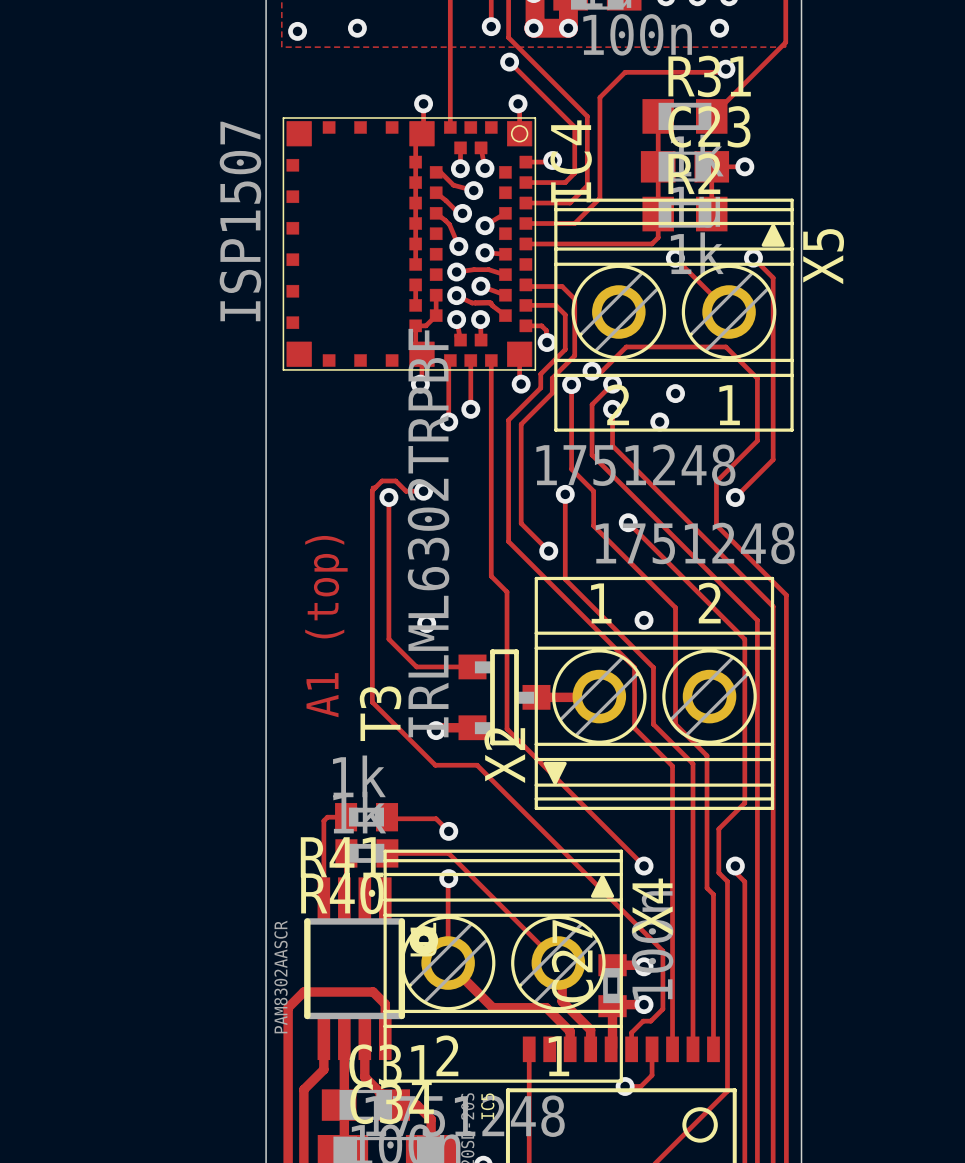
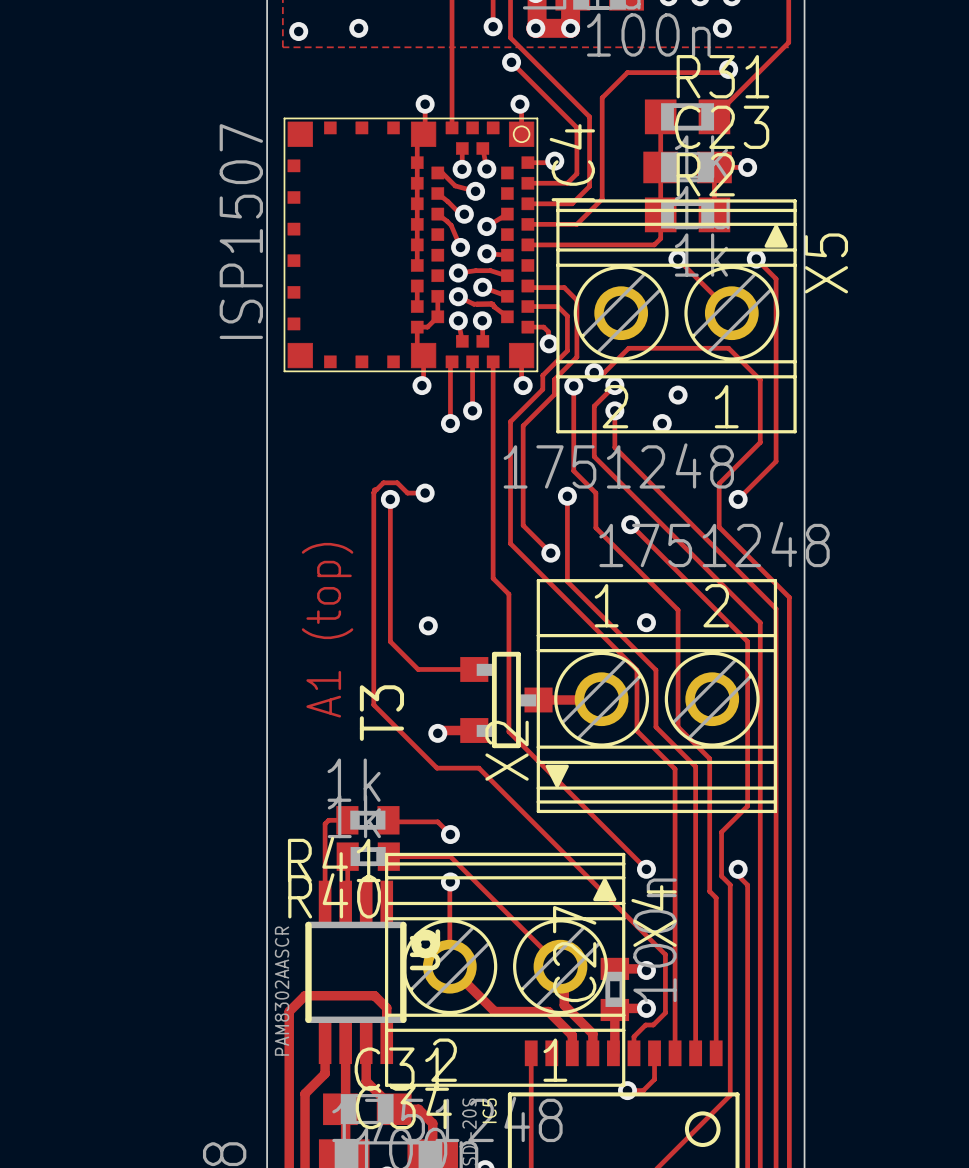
T3 value: IRLML6302TRPBF (428, 533) -> none

